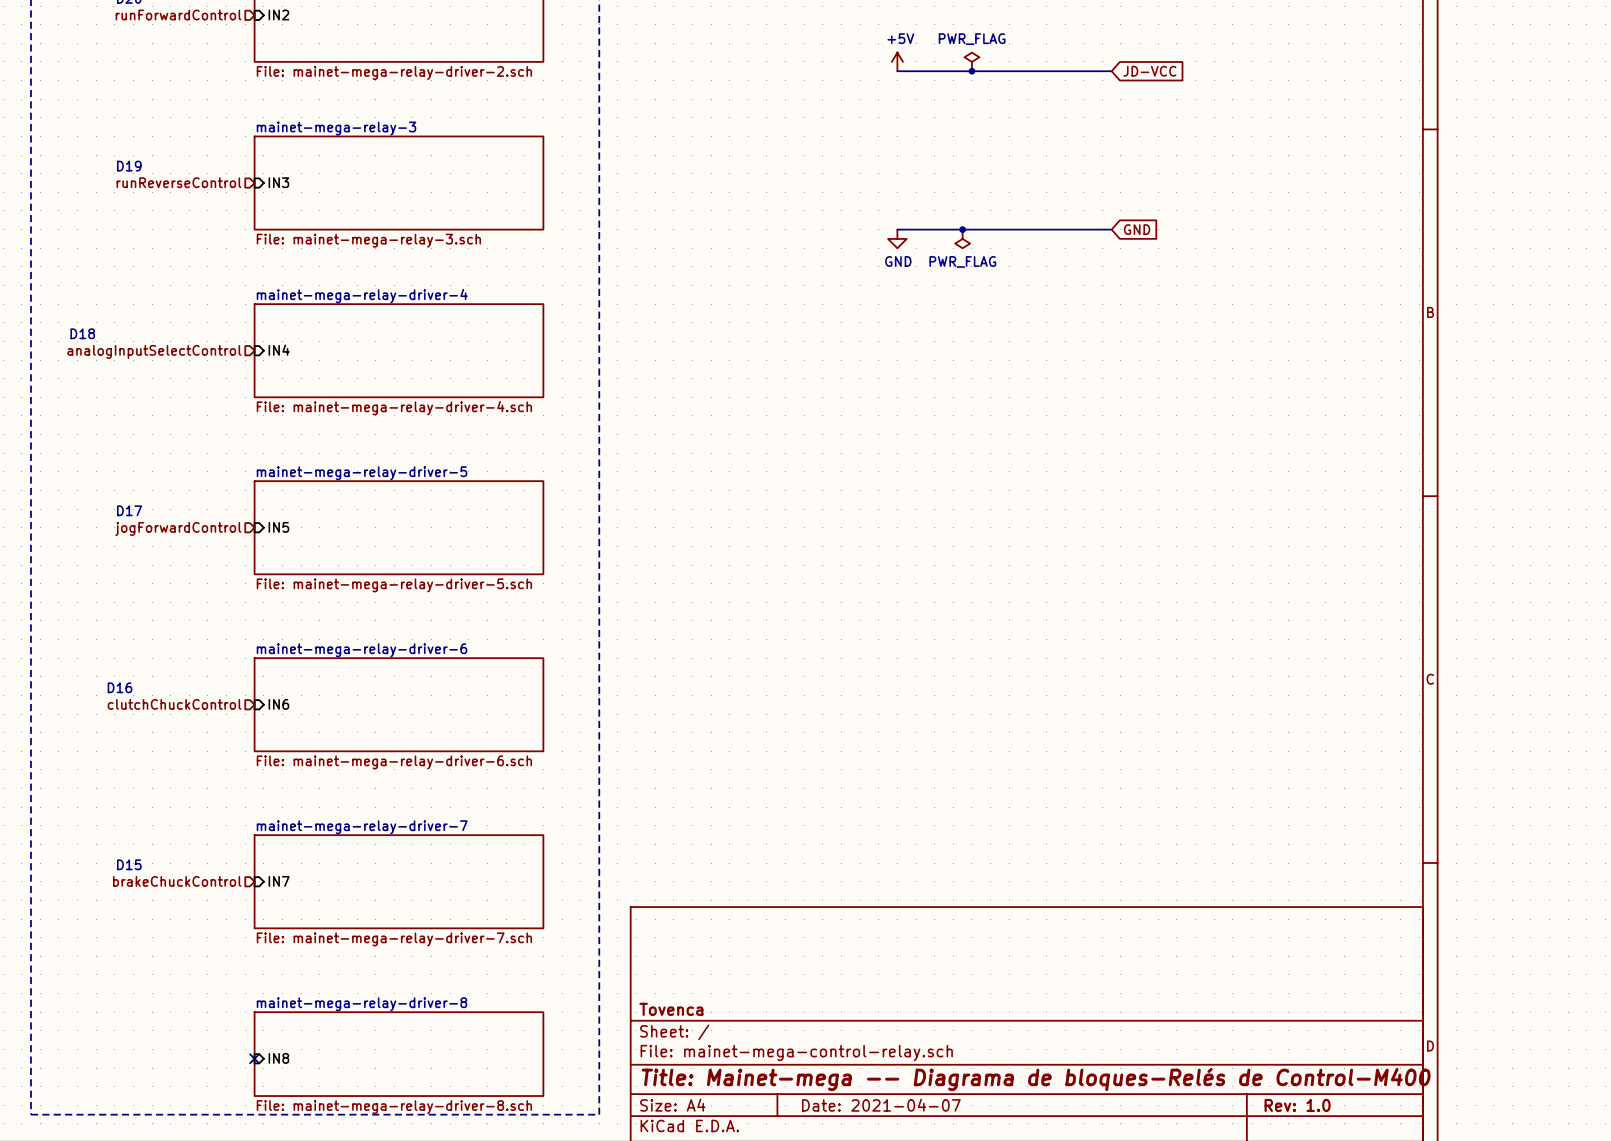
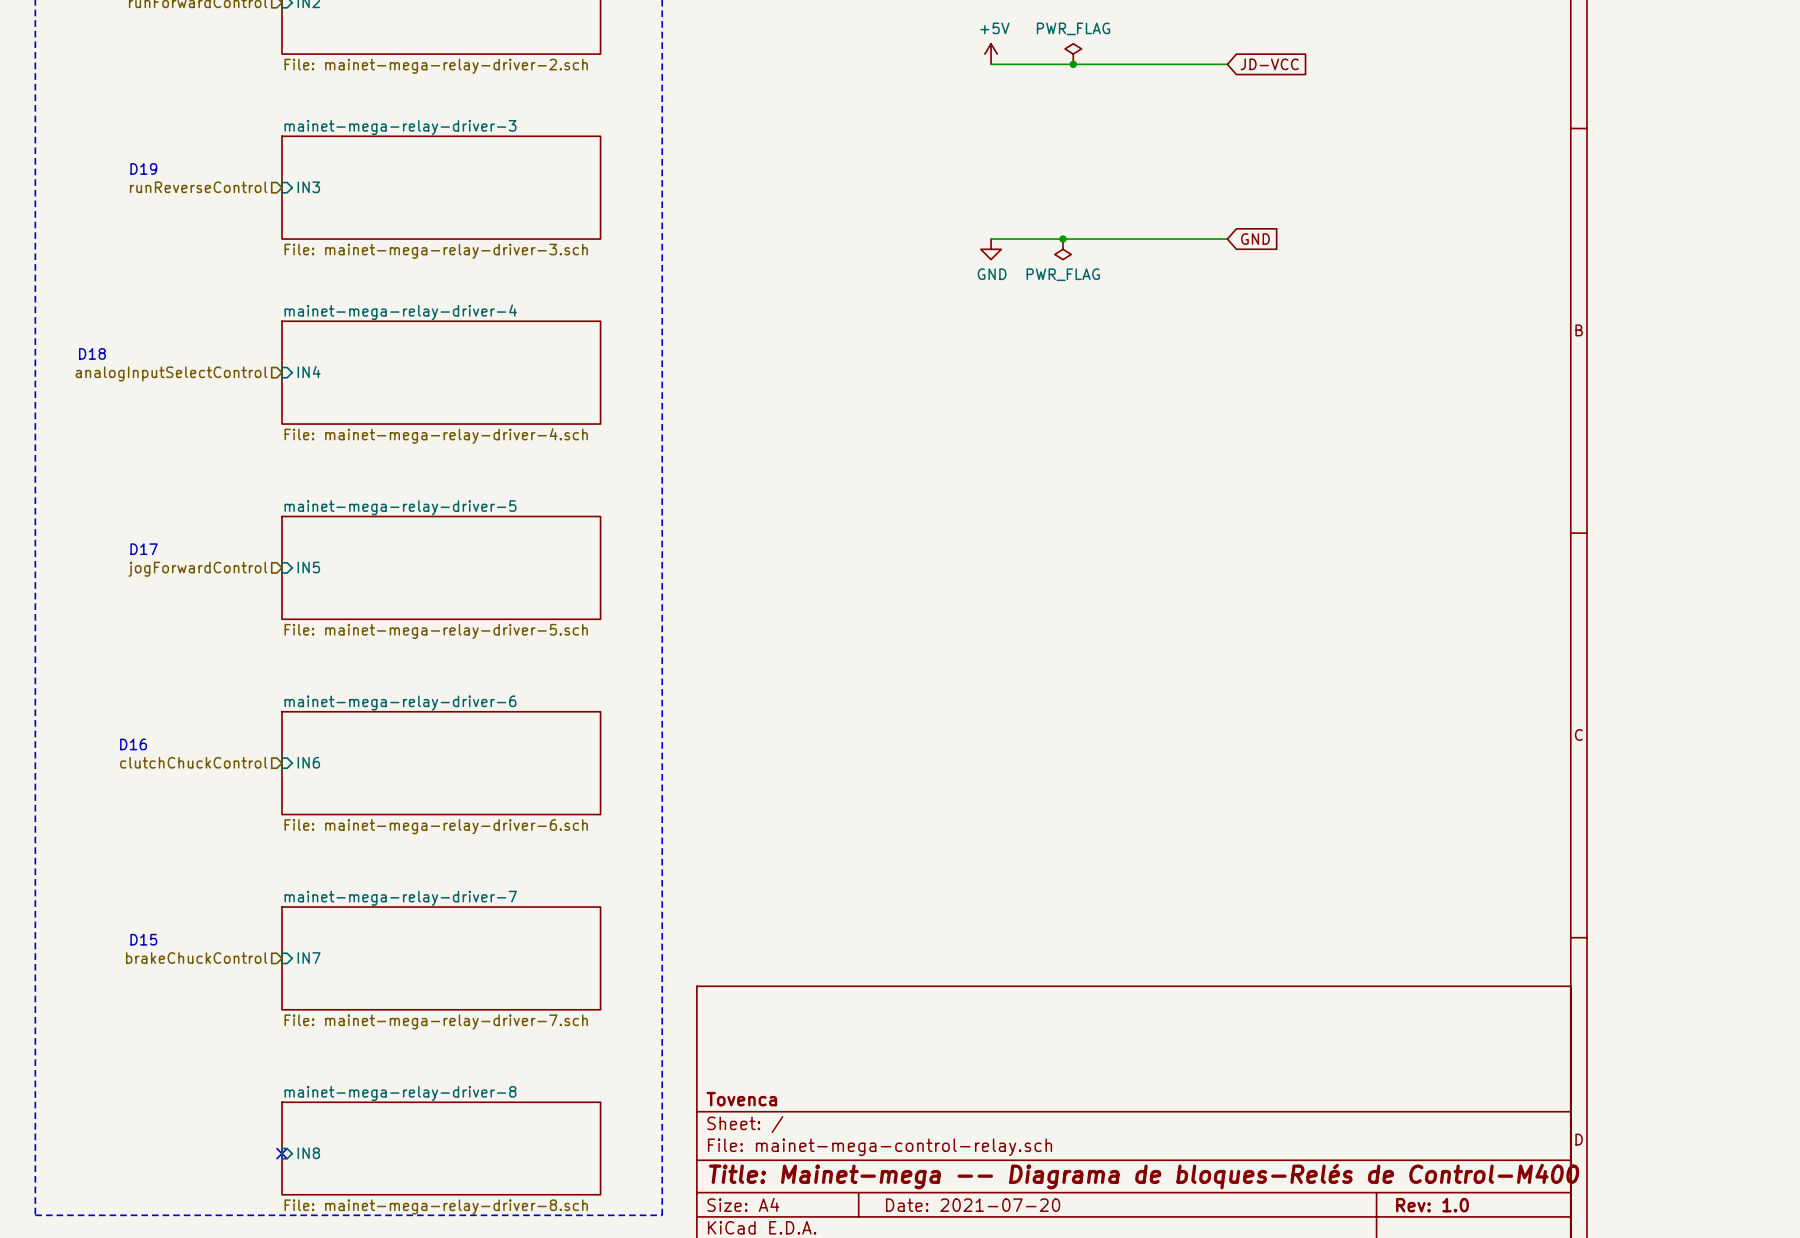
sheet mainet-mega-relay-3 name: mainet-mega-relay-3 (336, 128) -> mainet-mega-relay-driver-3 (400, 127)
sheet mainet-mega-relay-3 value: File: mainet-mega-relay-3.sch (368, 240) -> File: mainet-mega-relay-driver-3.sch (436, 251)
title block: Date: 2021-04-07 (881, 1105) -> Date: 2021-07-20 (973, 1205)

